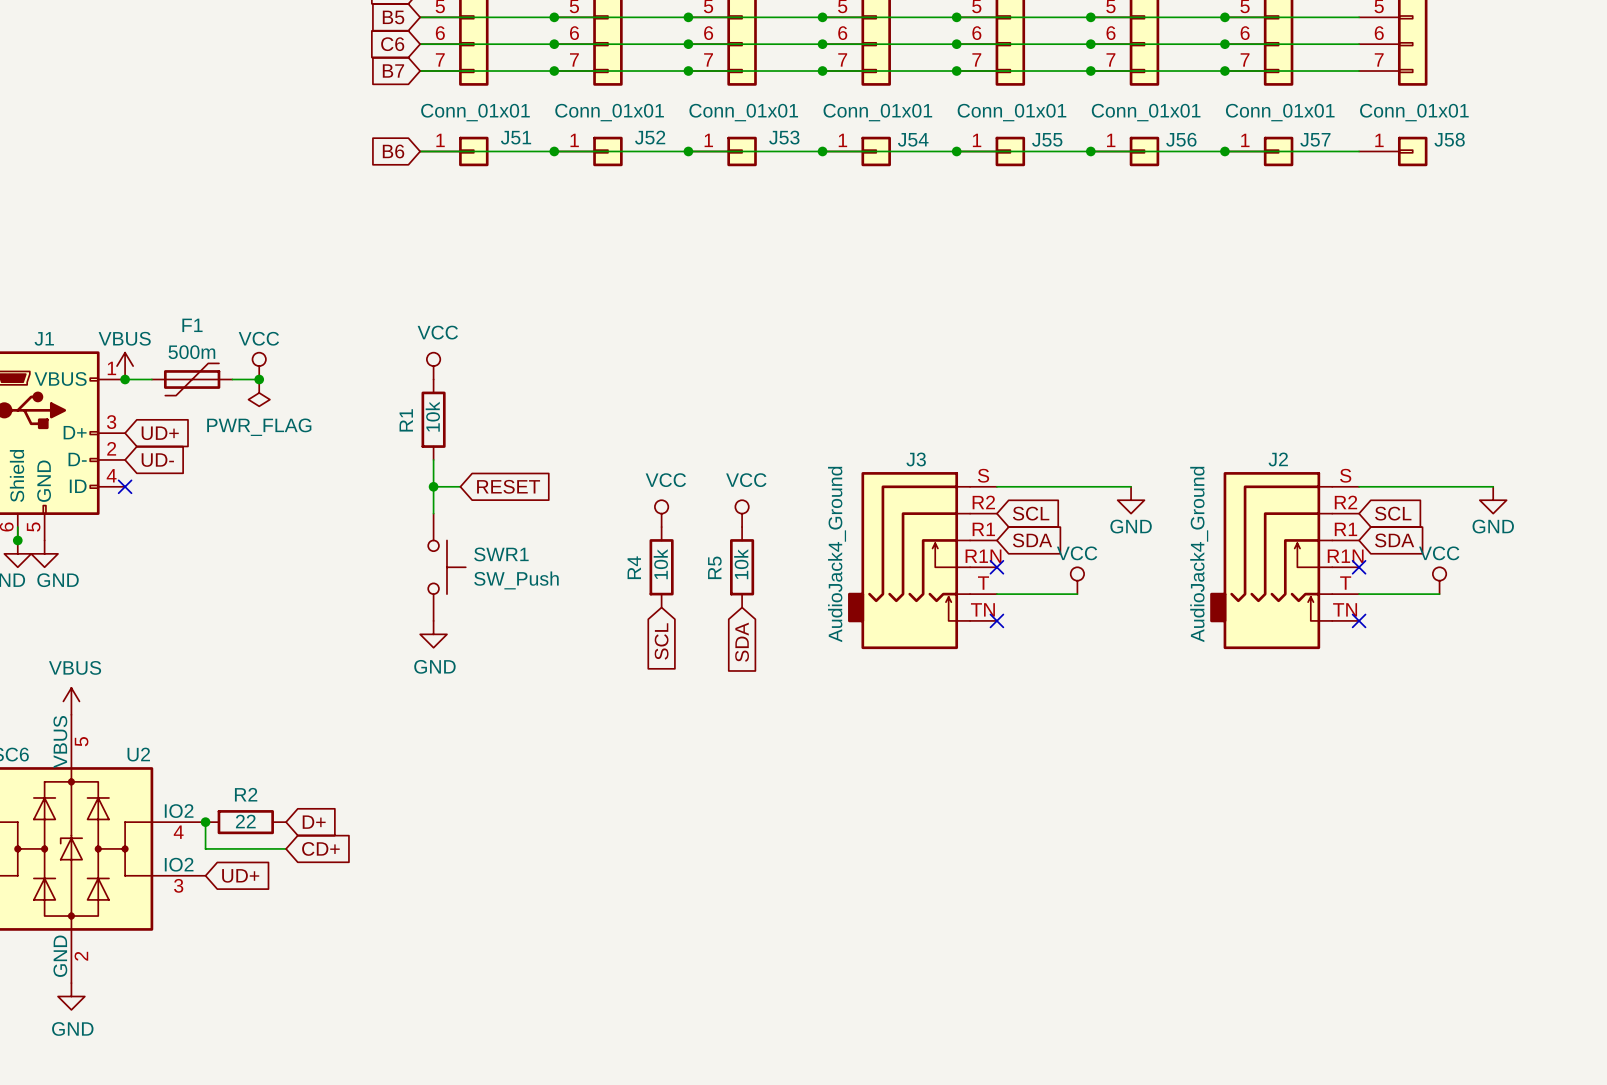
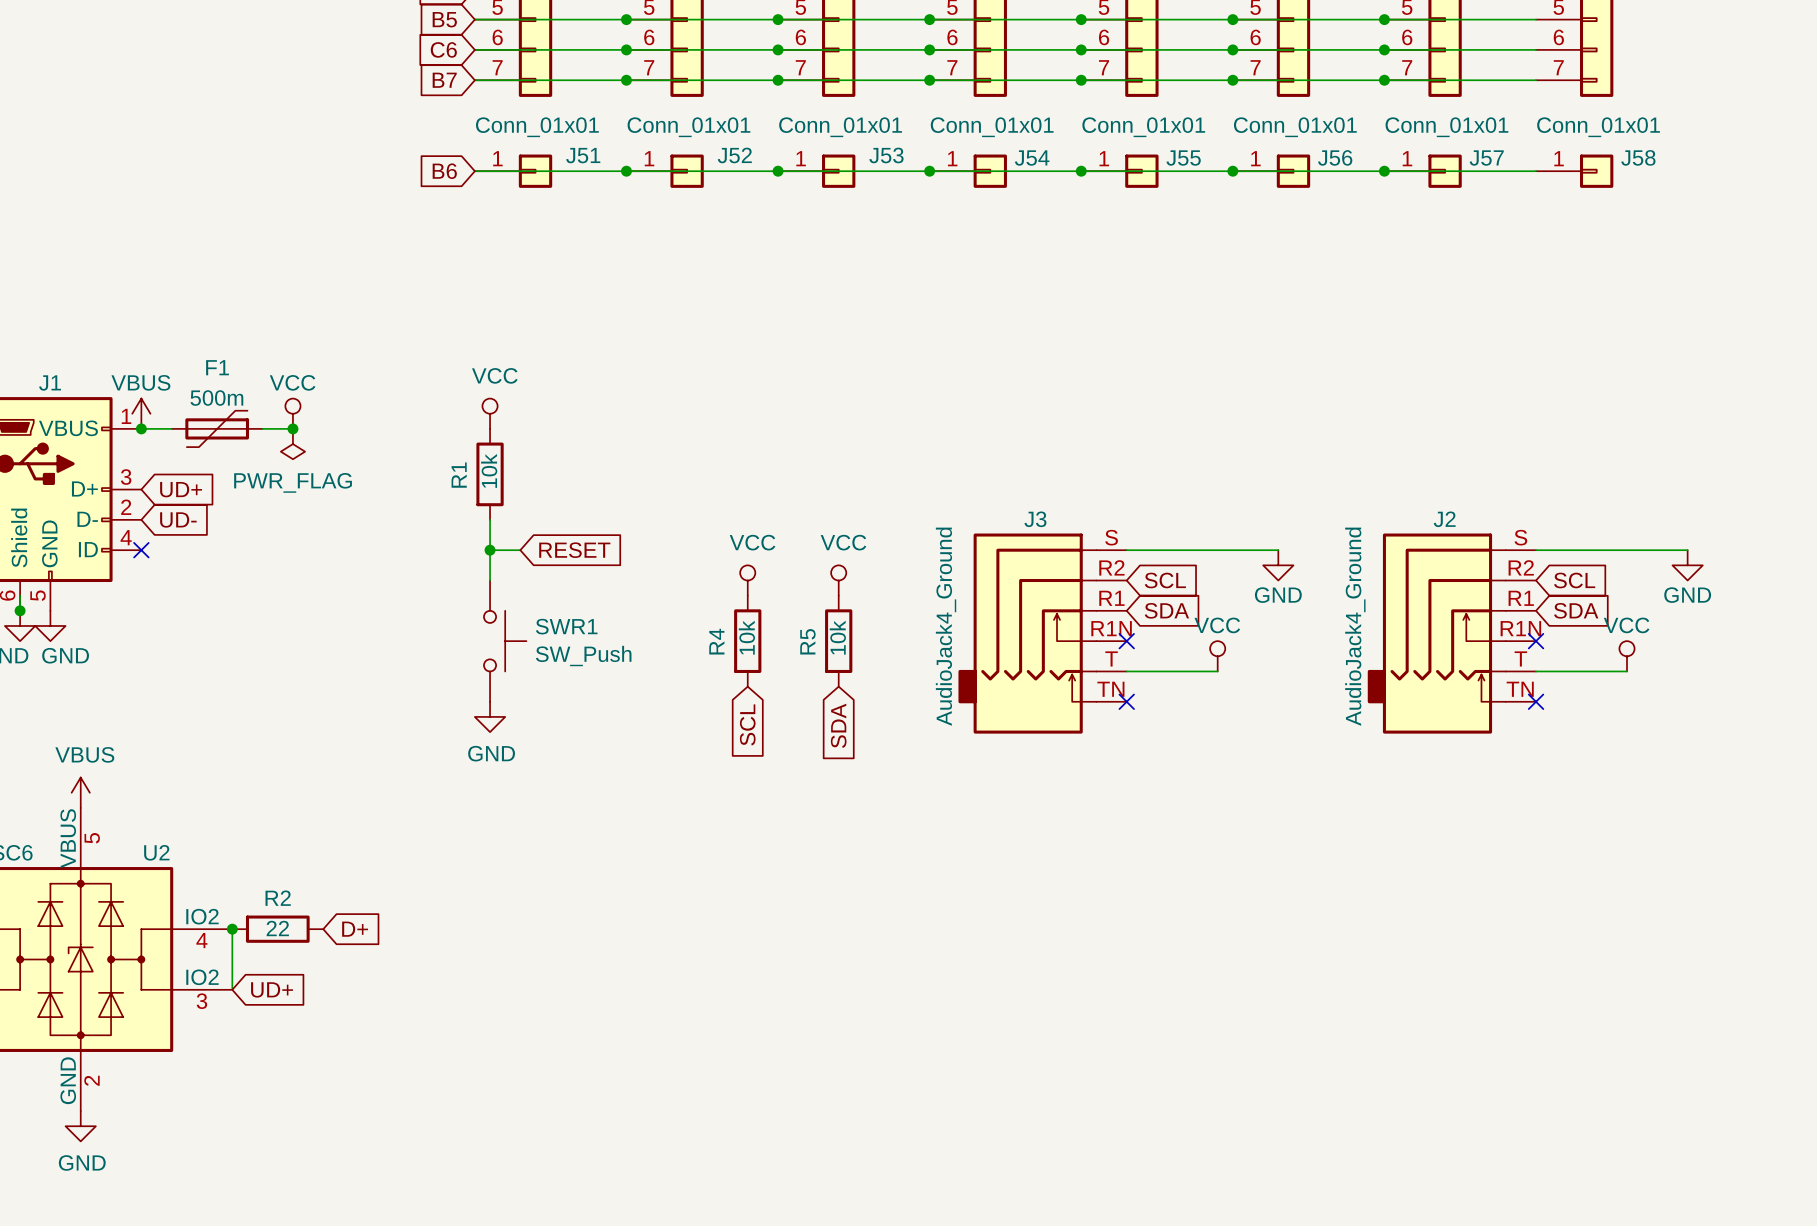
wire: (205, 848) (286, 848) -> (232, 959) (232, 989)
global label: CD+ (320, 848) -> none

